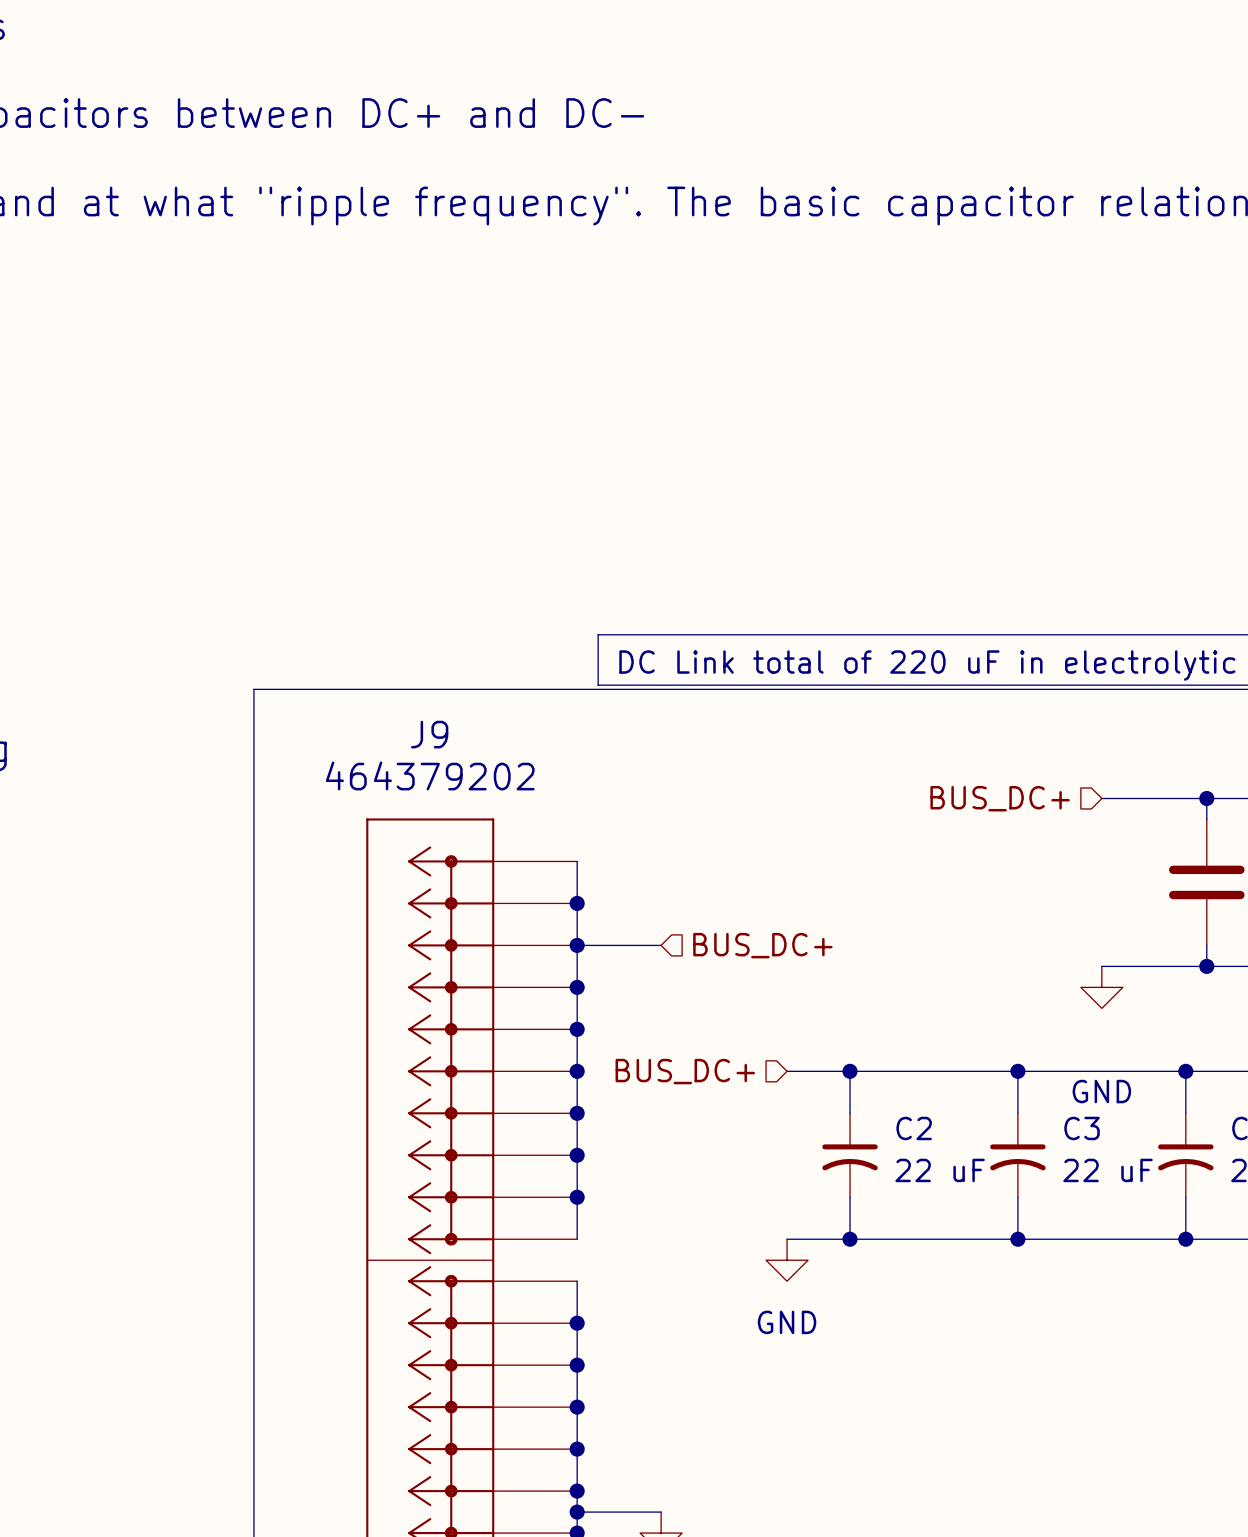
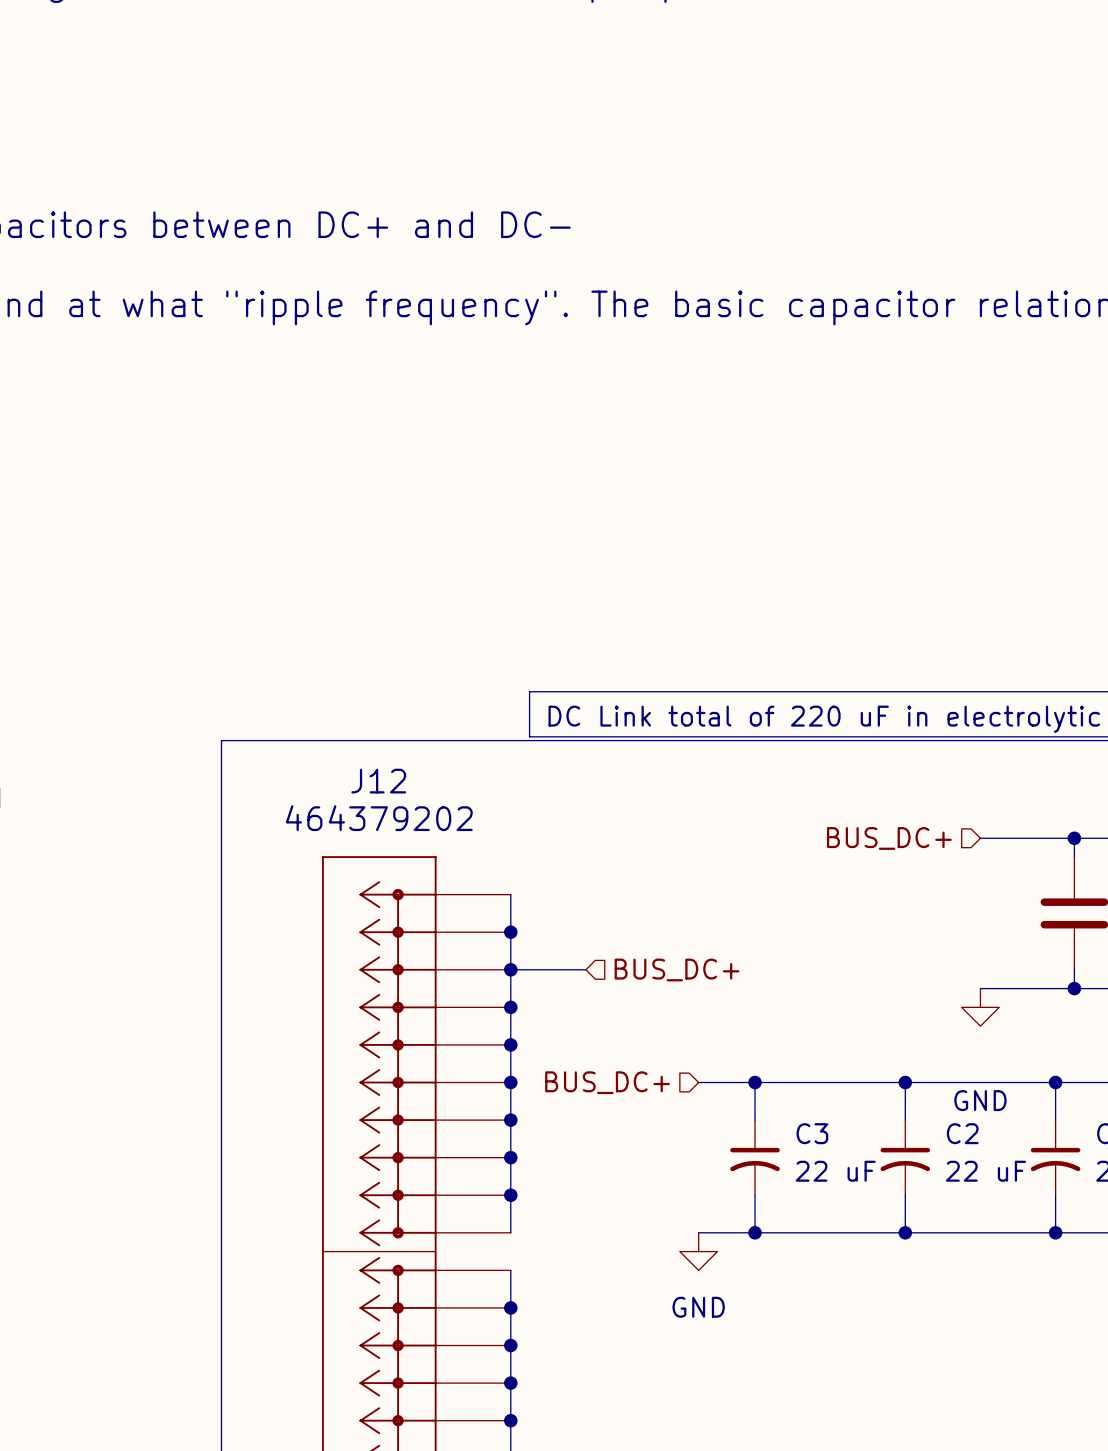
J9 name: J9 (429, 734) -> J12 (378, 781)
C2 name: C2 (914, 1128) -> C3 (812, 1133)
C3 name: C3 (1082, 1128) -> C2 (962, 1133)

